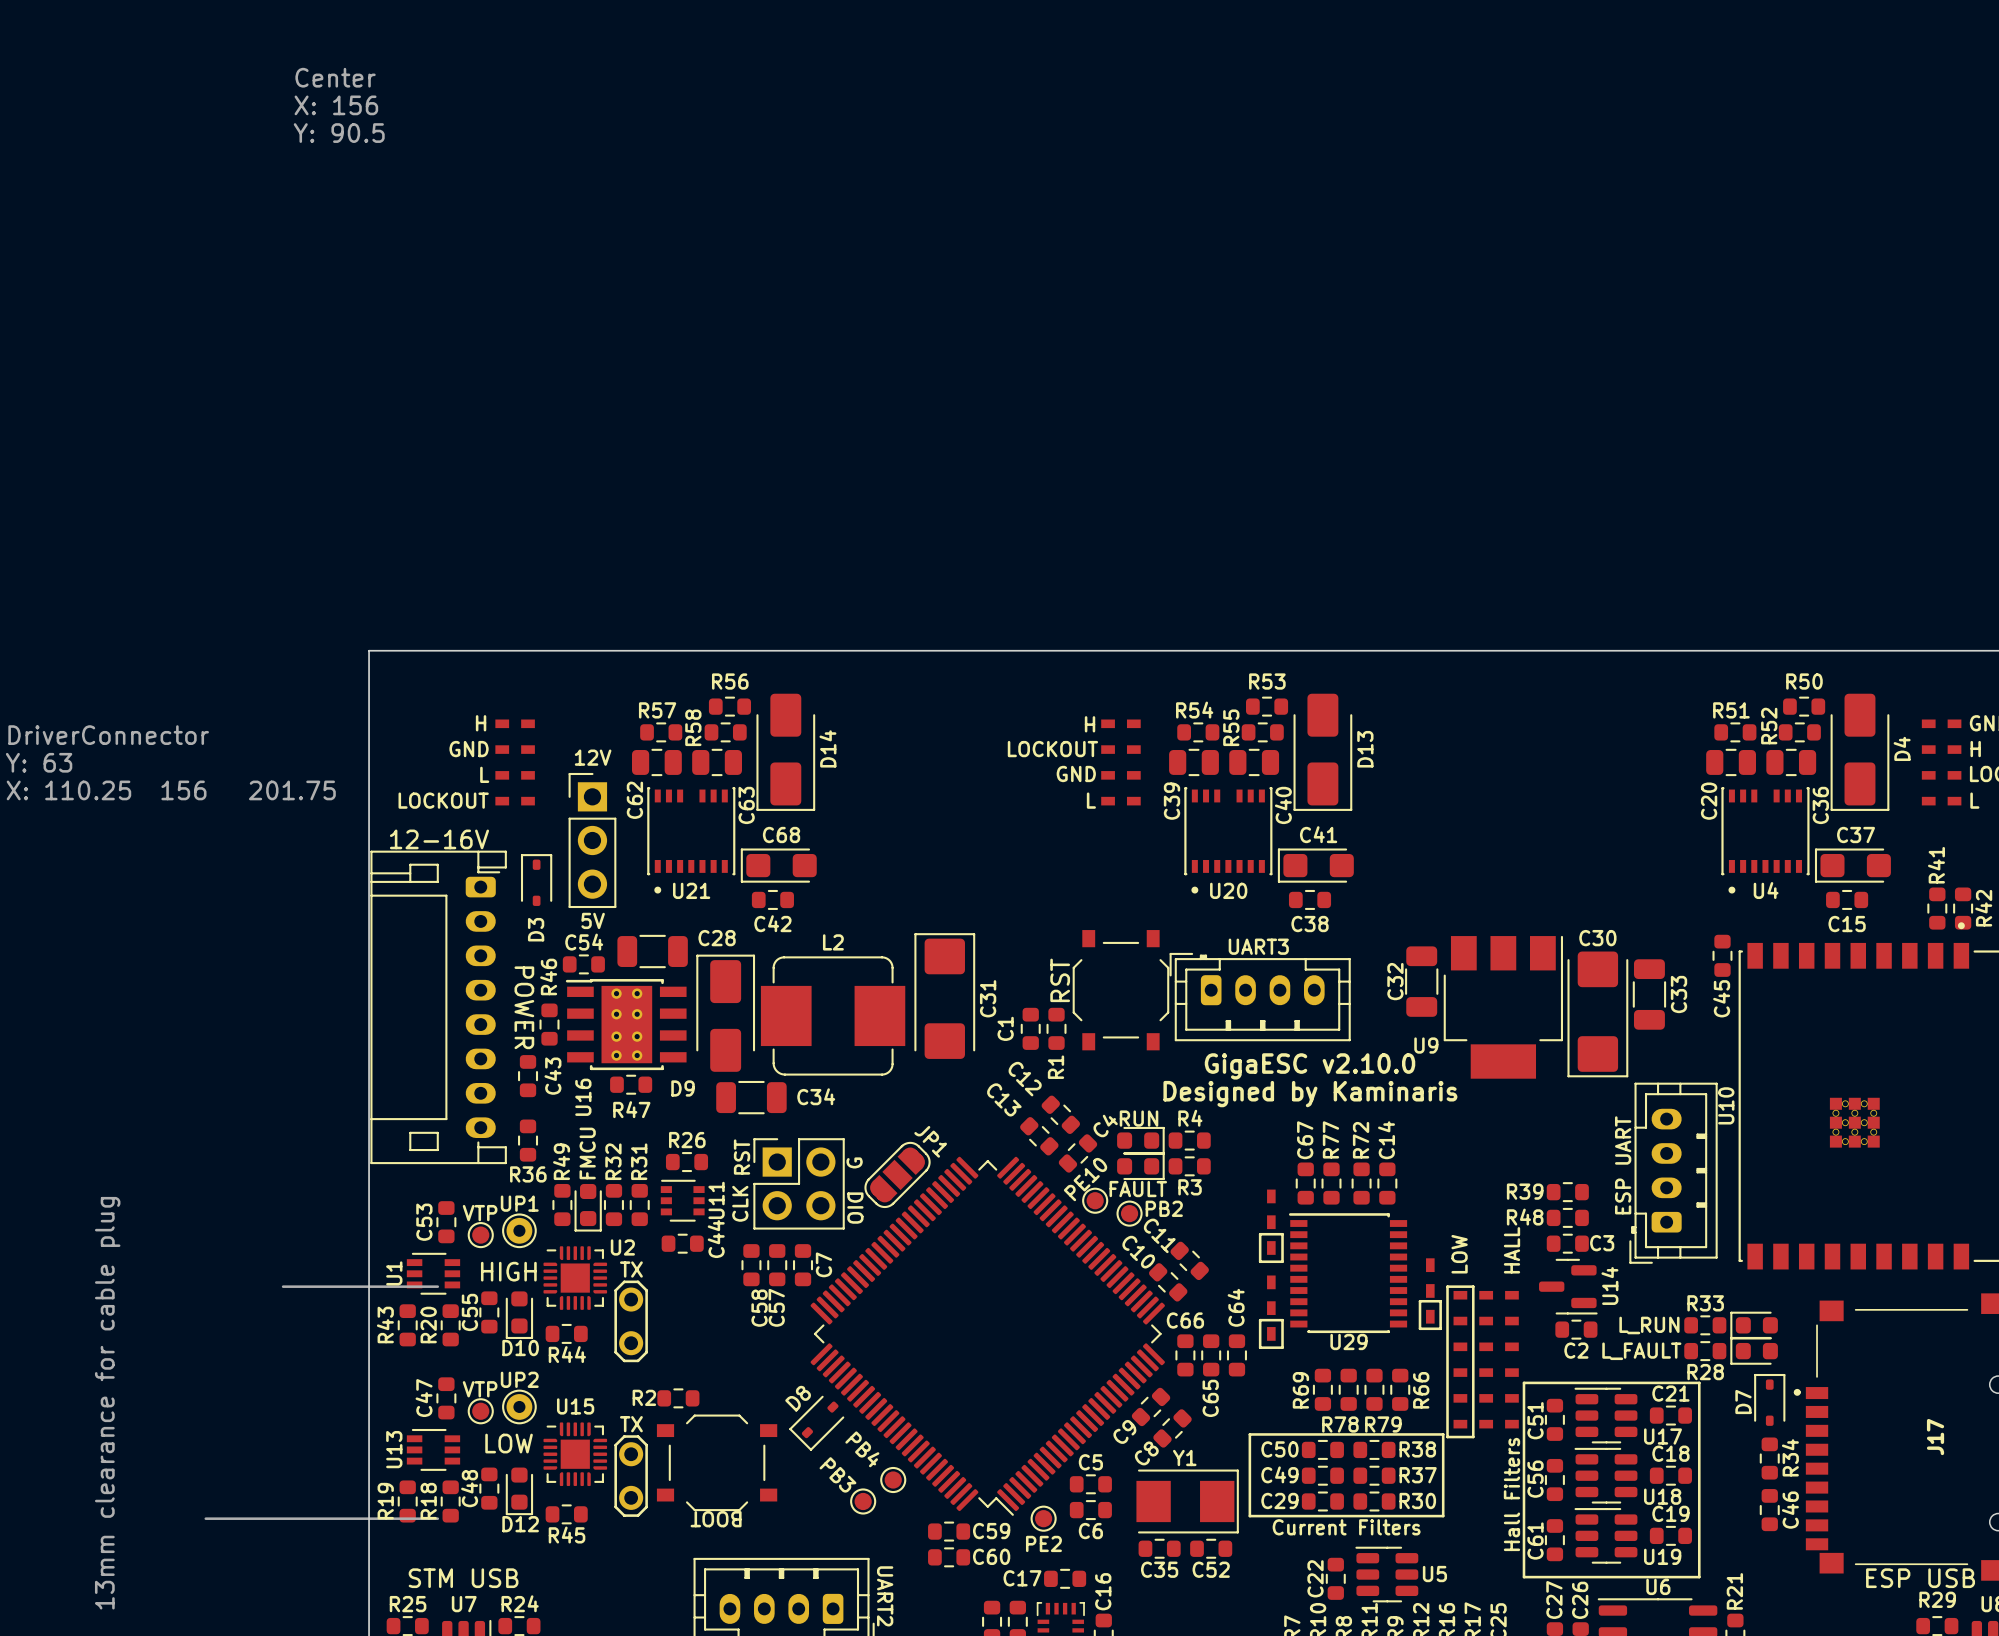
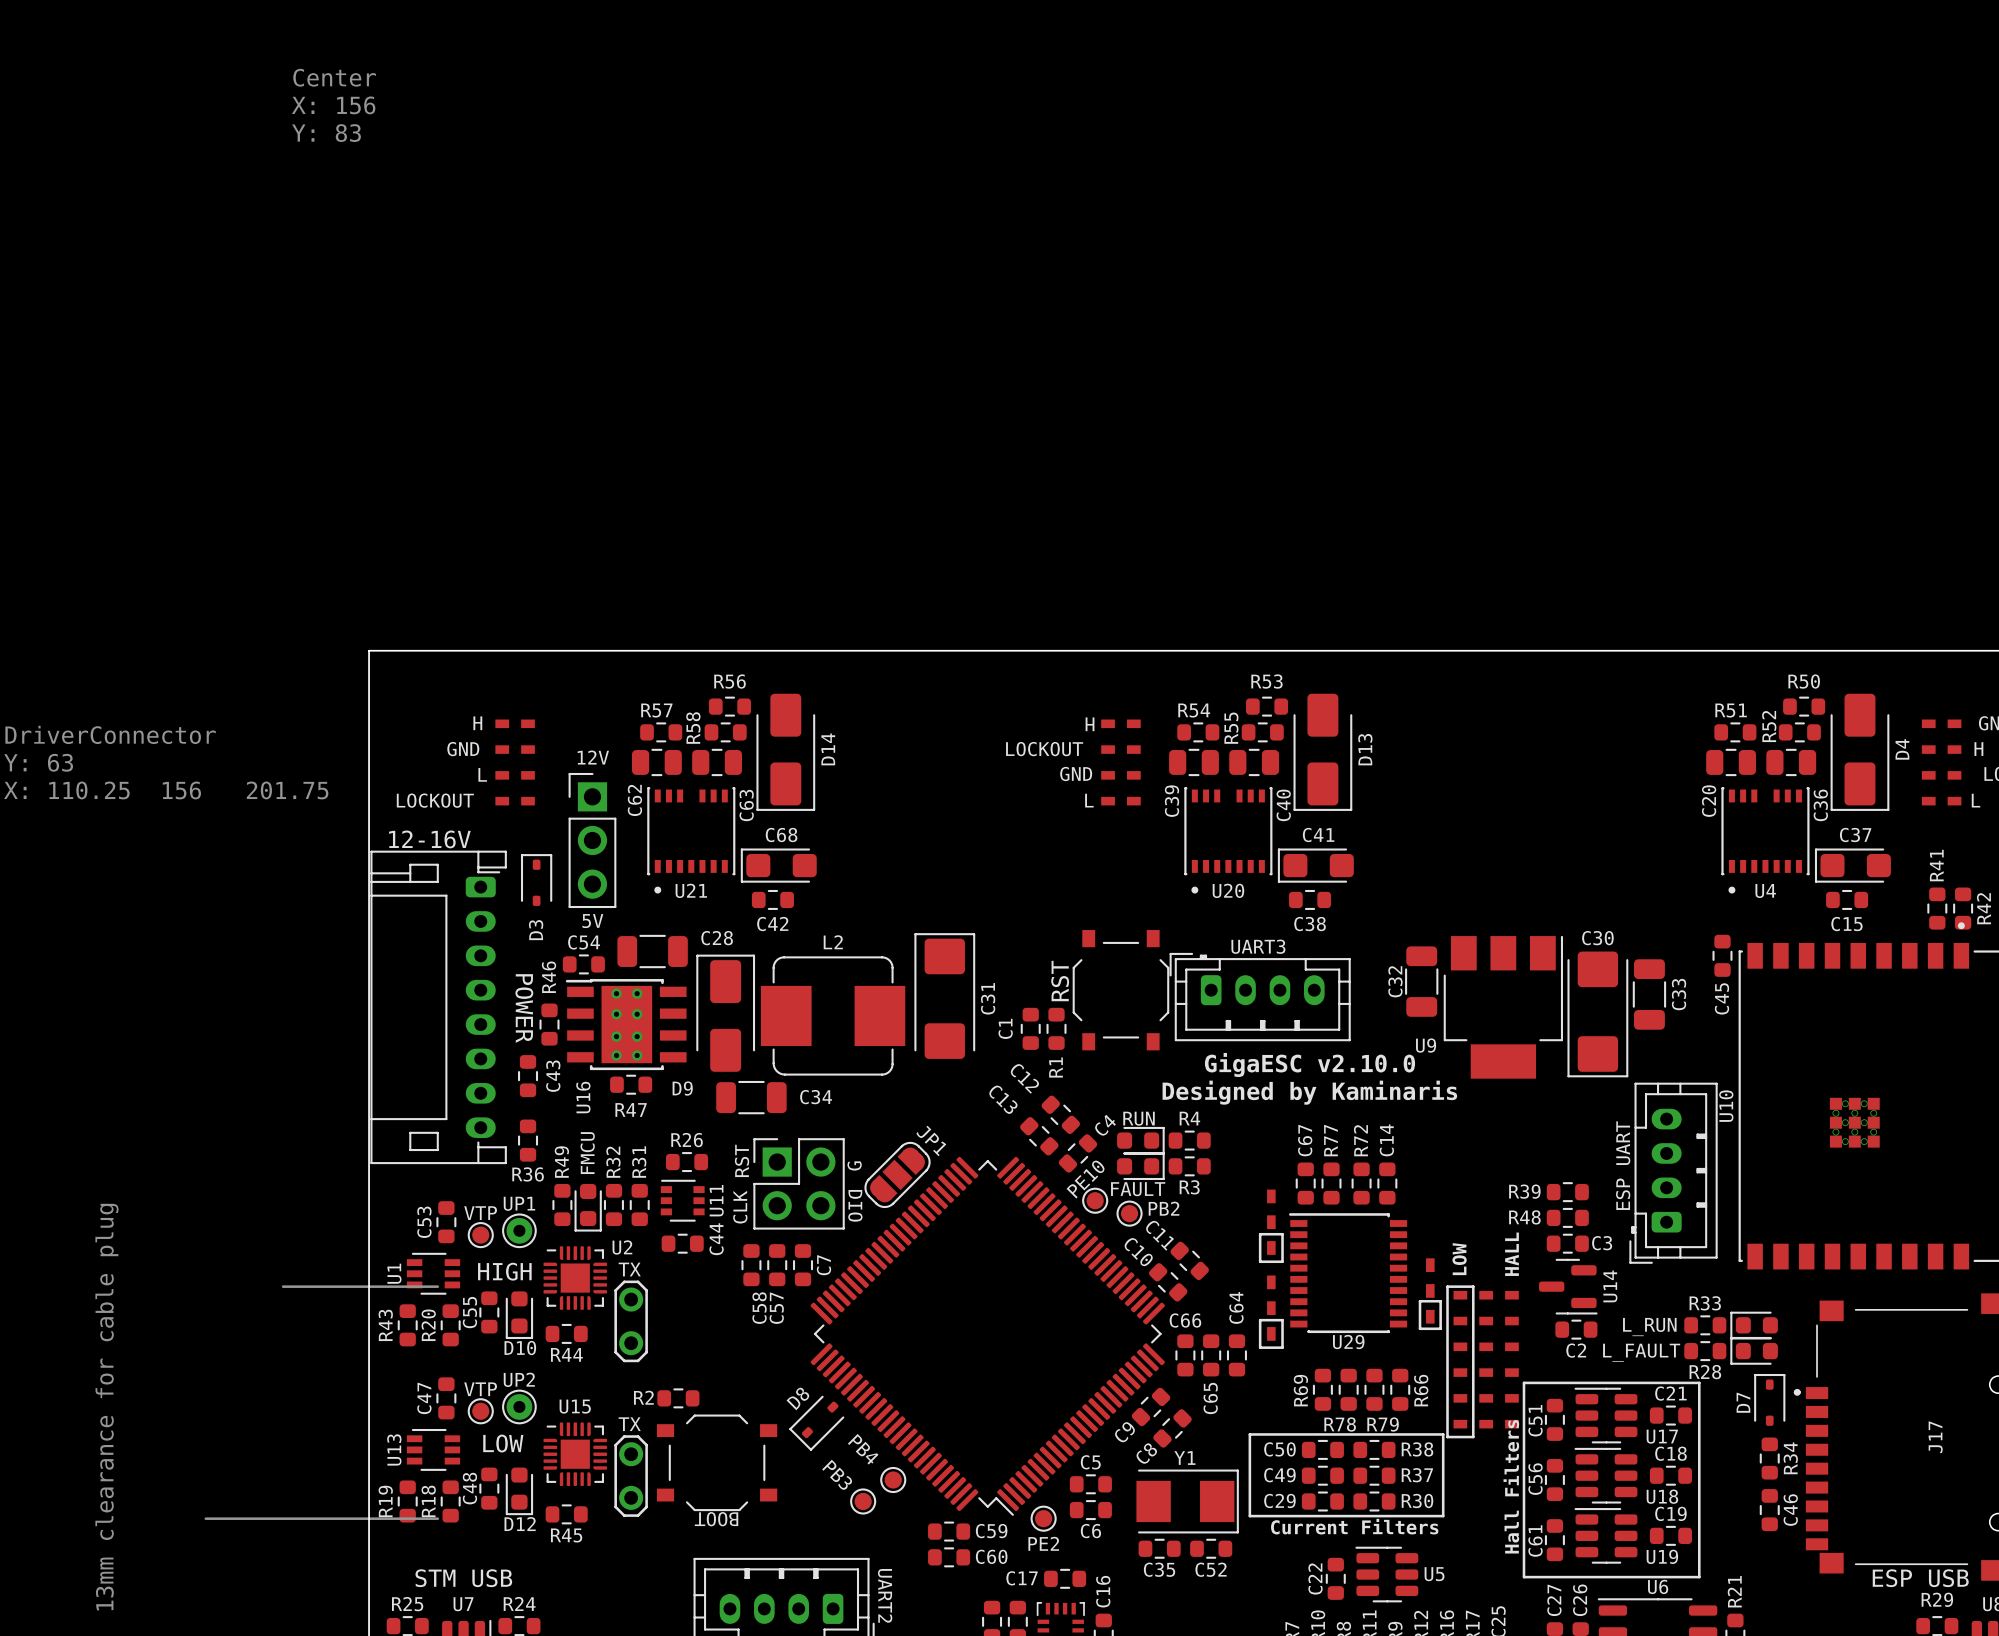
text: Y: 90.5 (339, 133) -> Y: 83 (326, 133)

